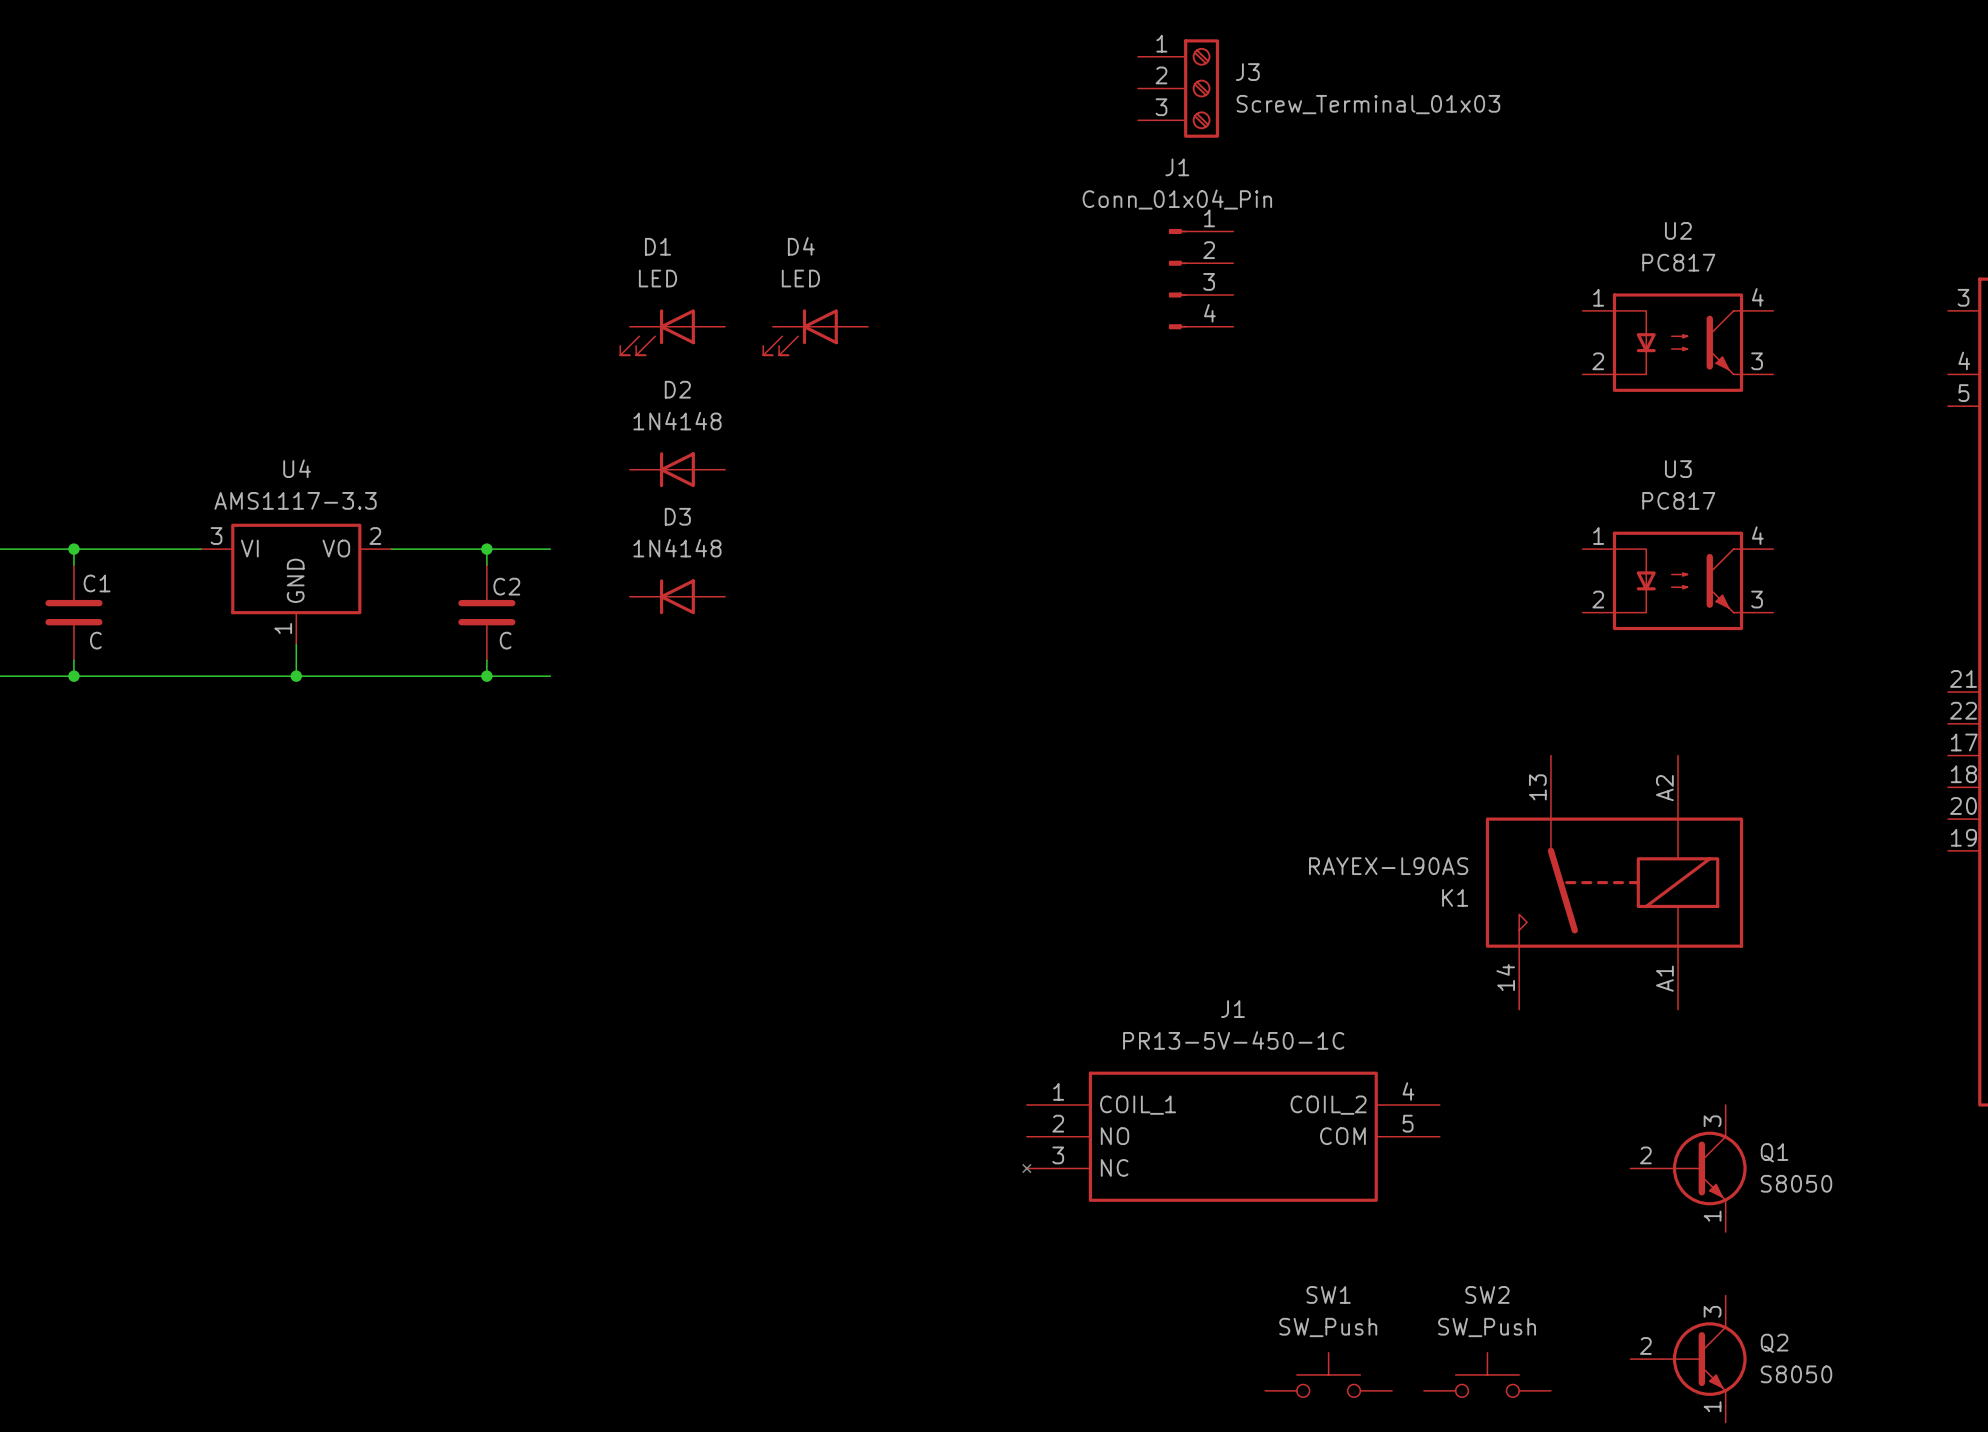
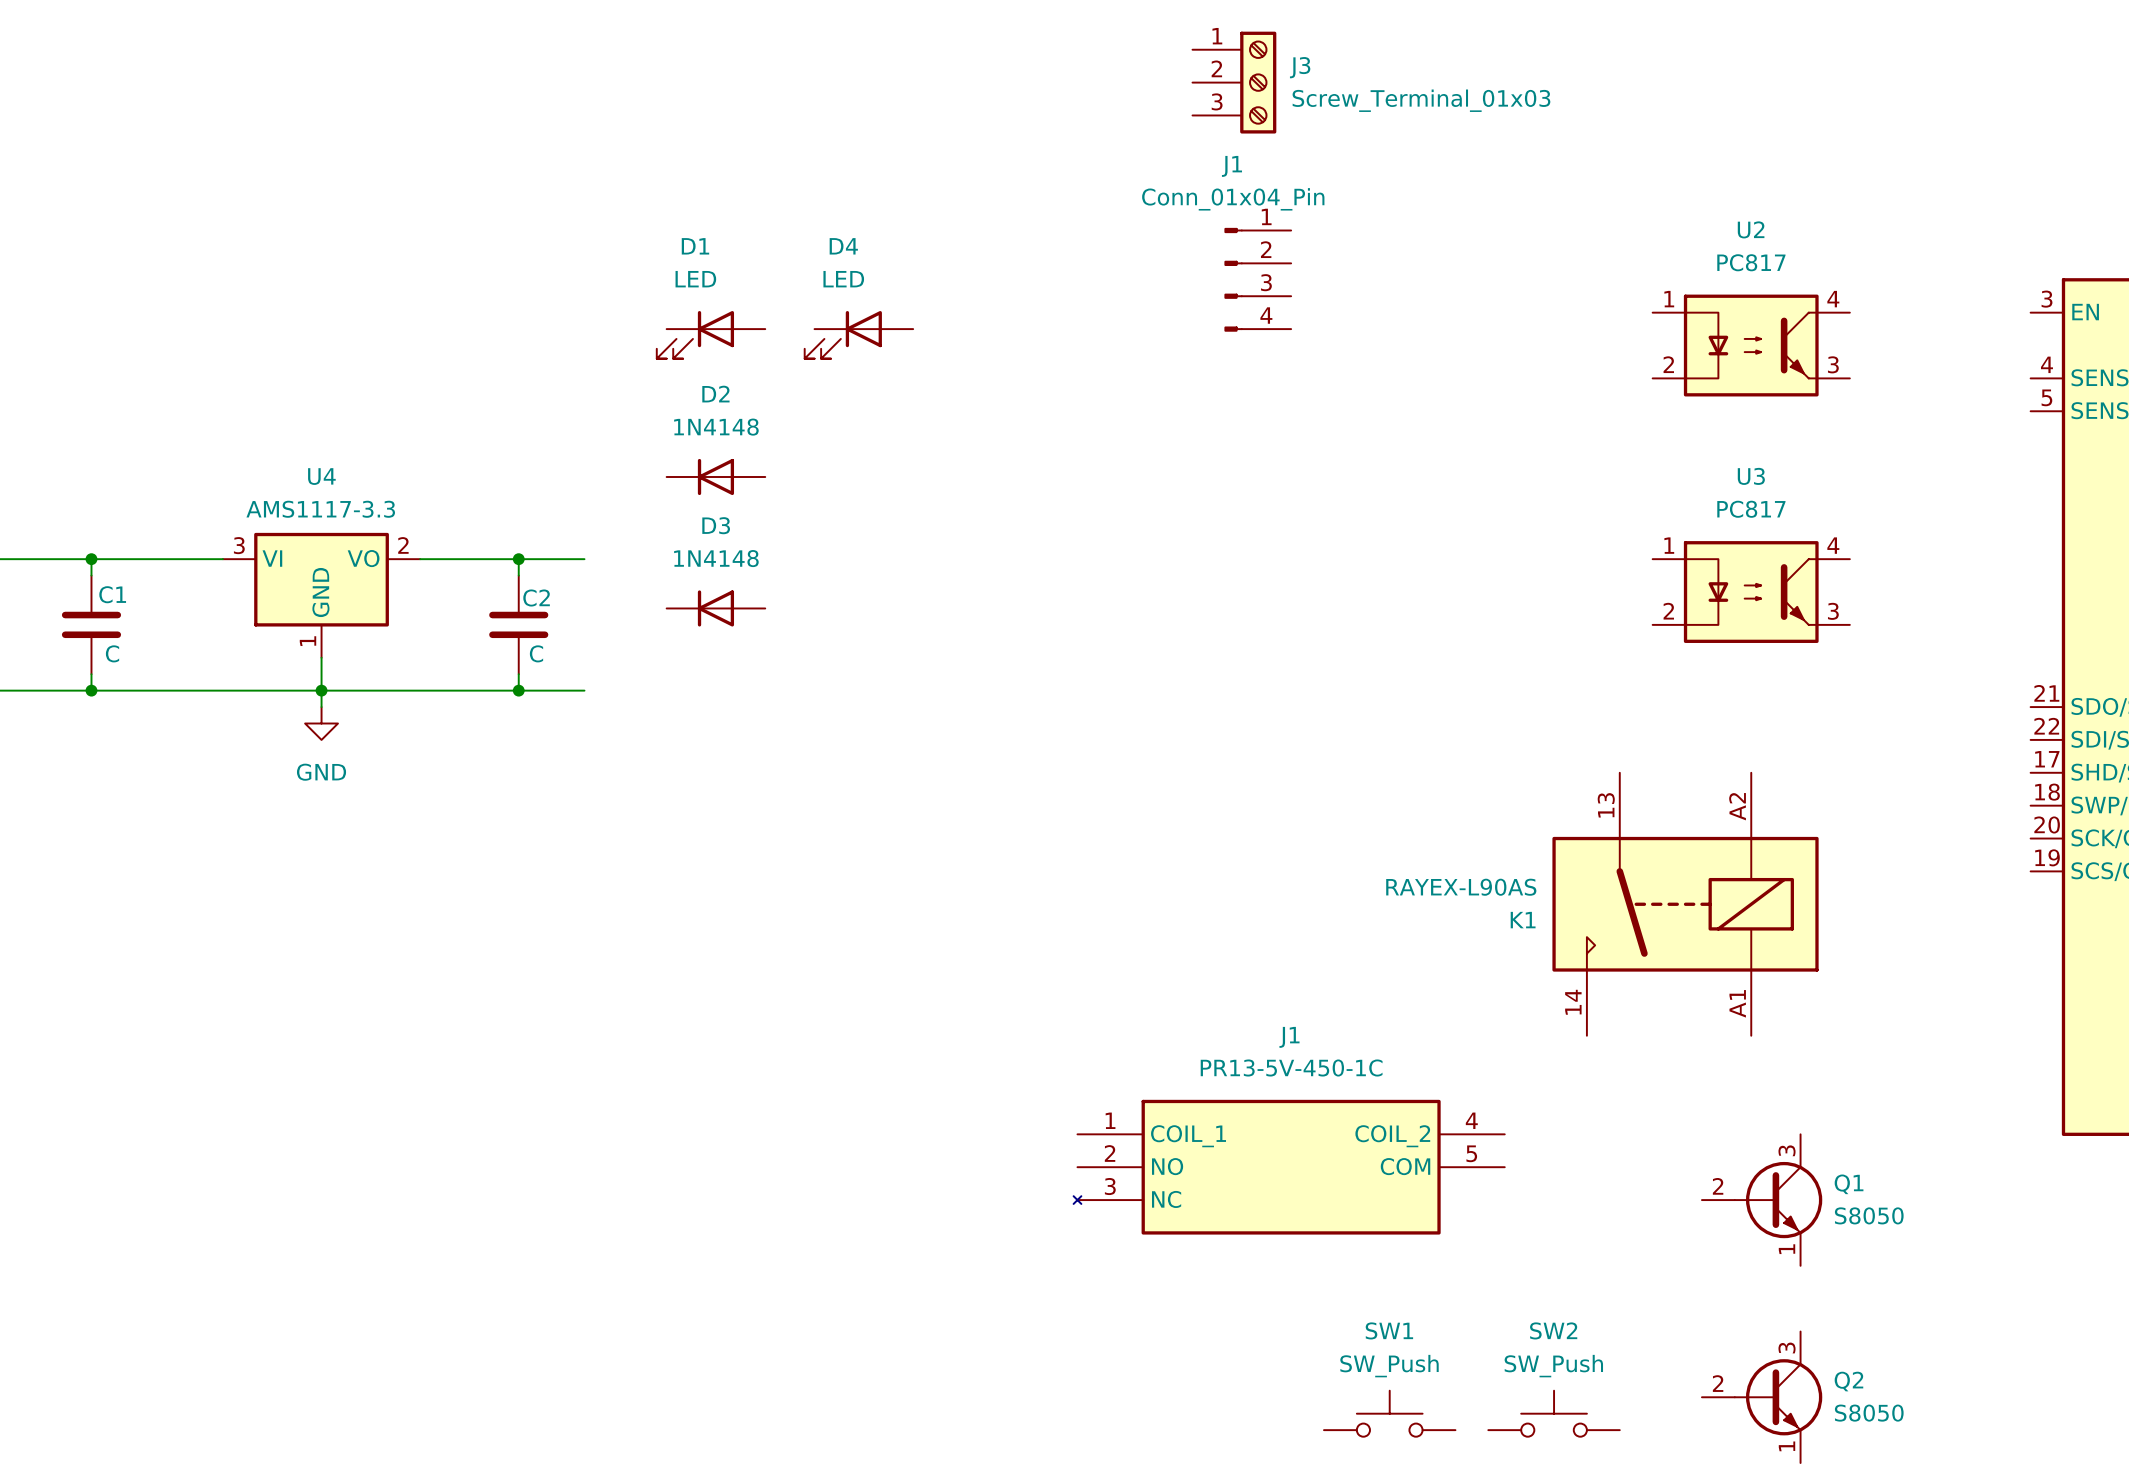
wire: none -> (321, 690) (321, 707)
power symbol: none -> GND (321, 723)

